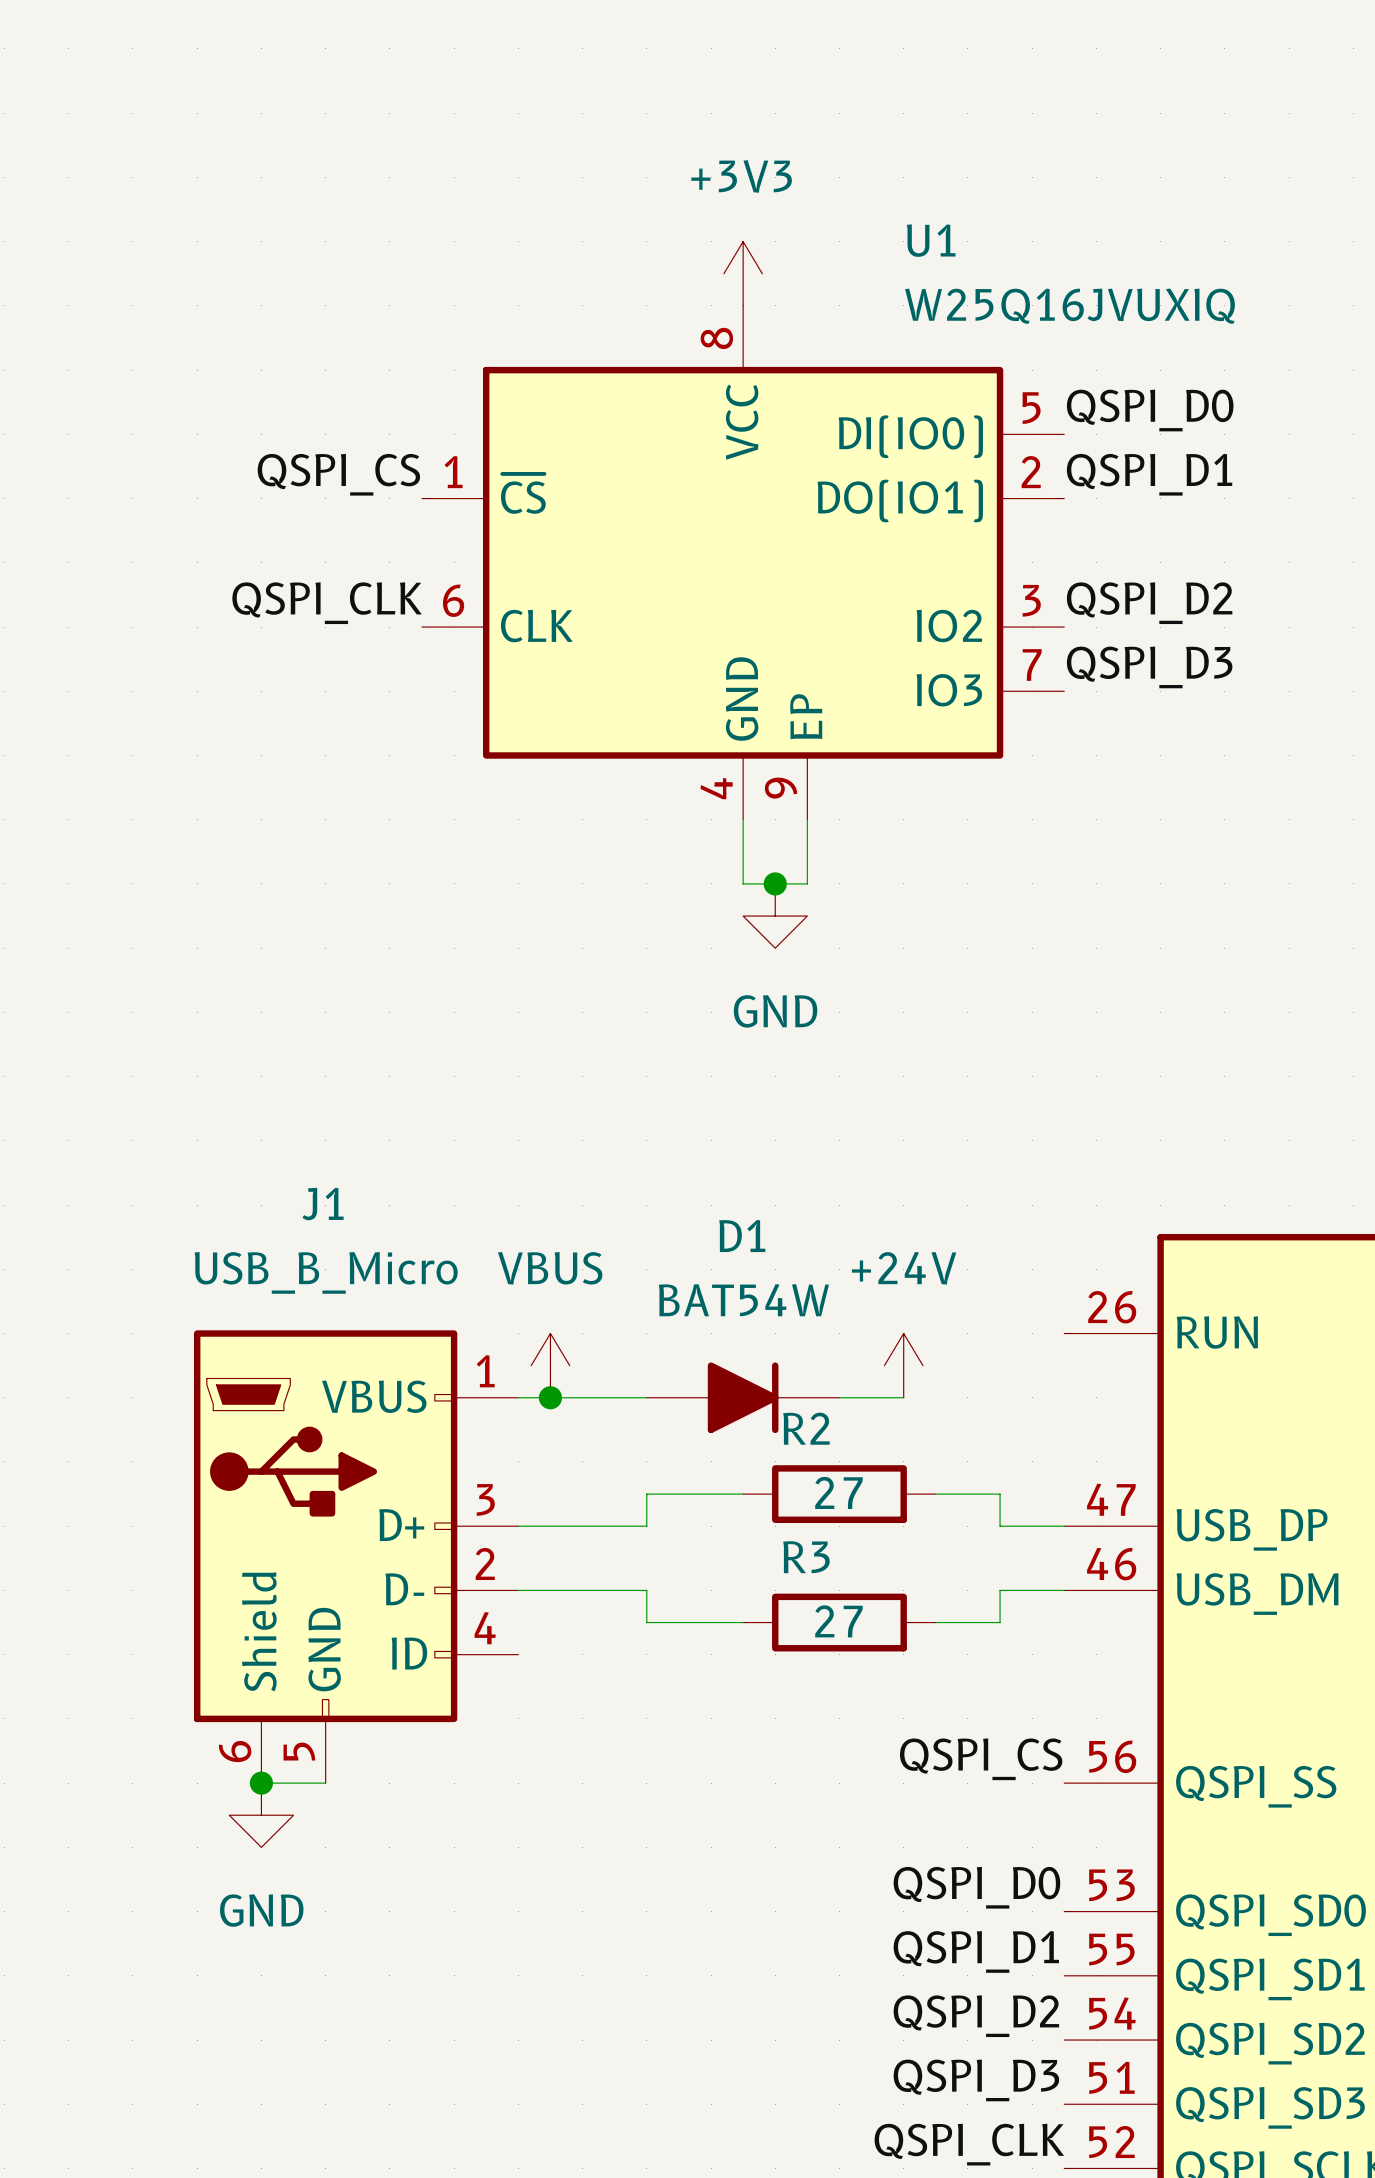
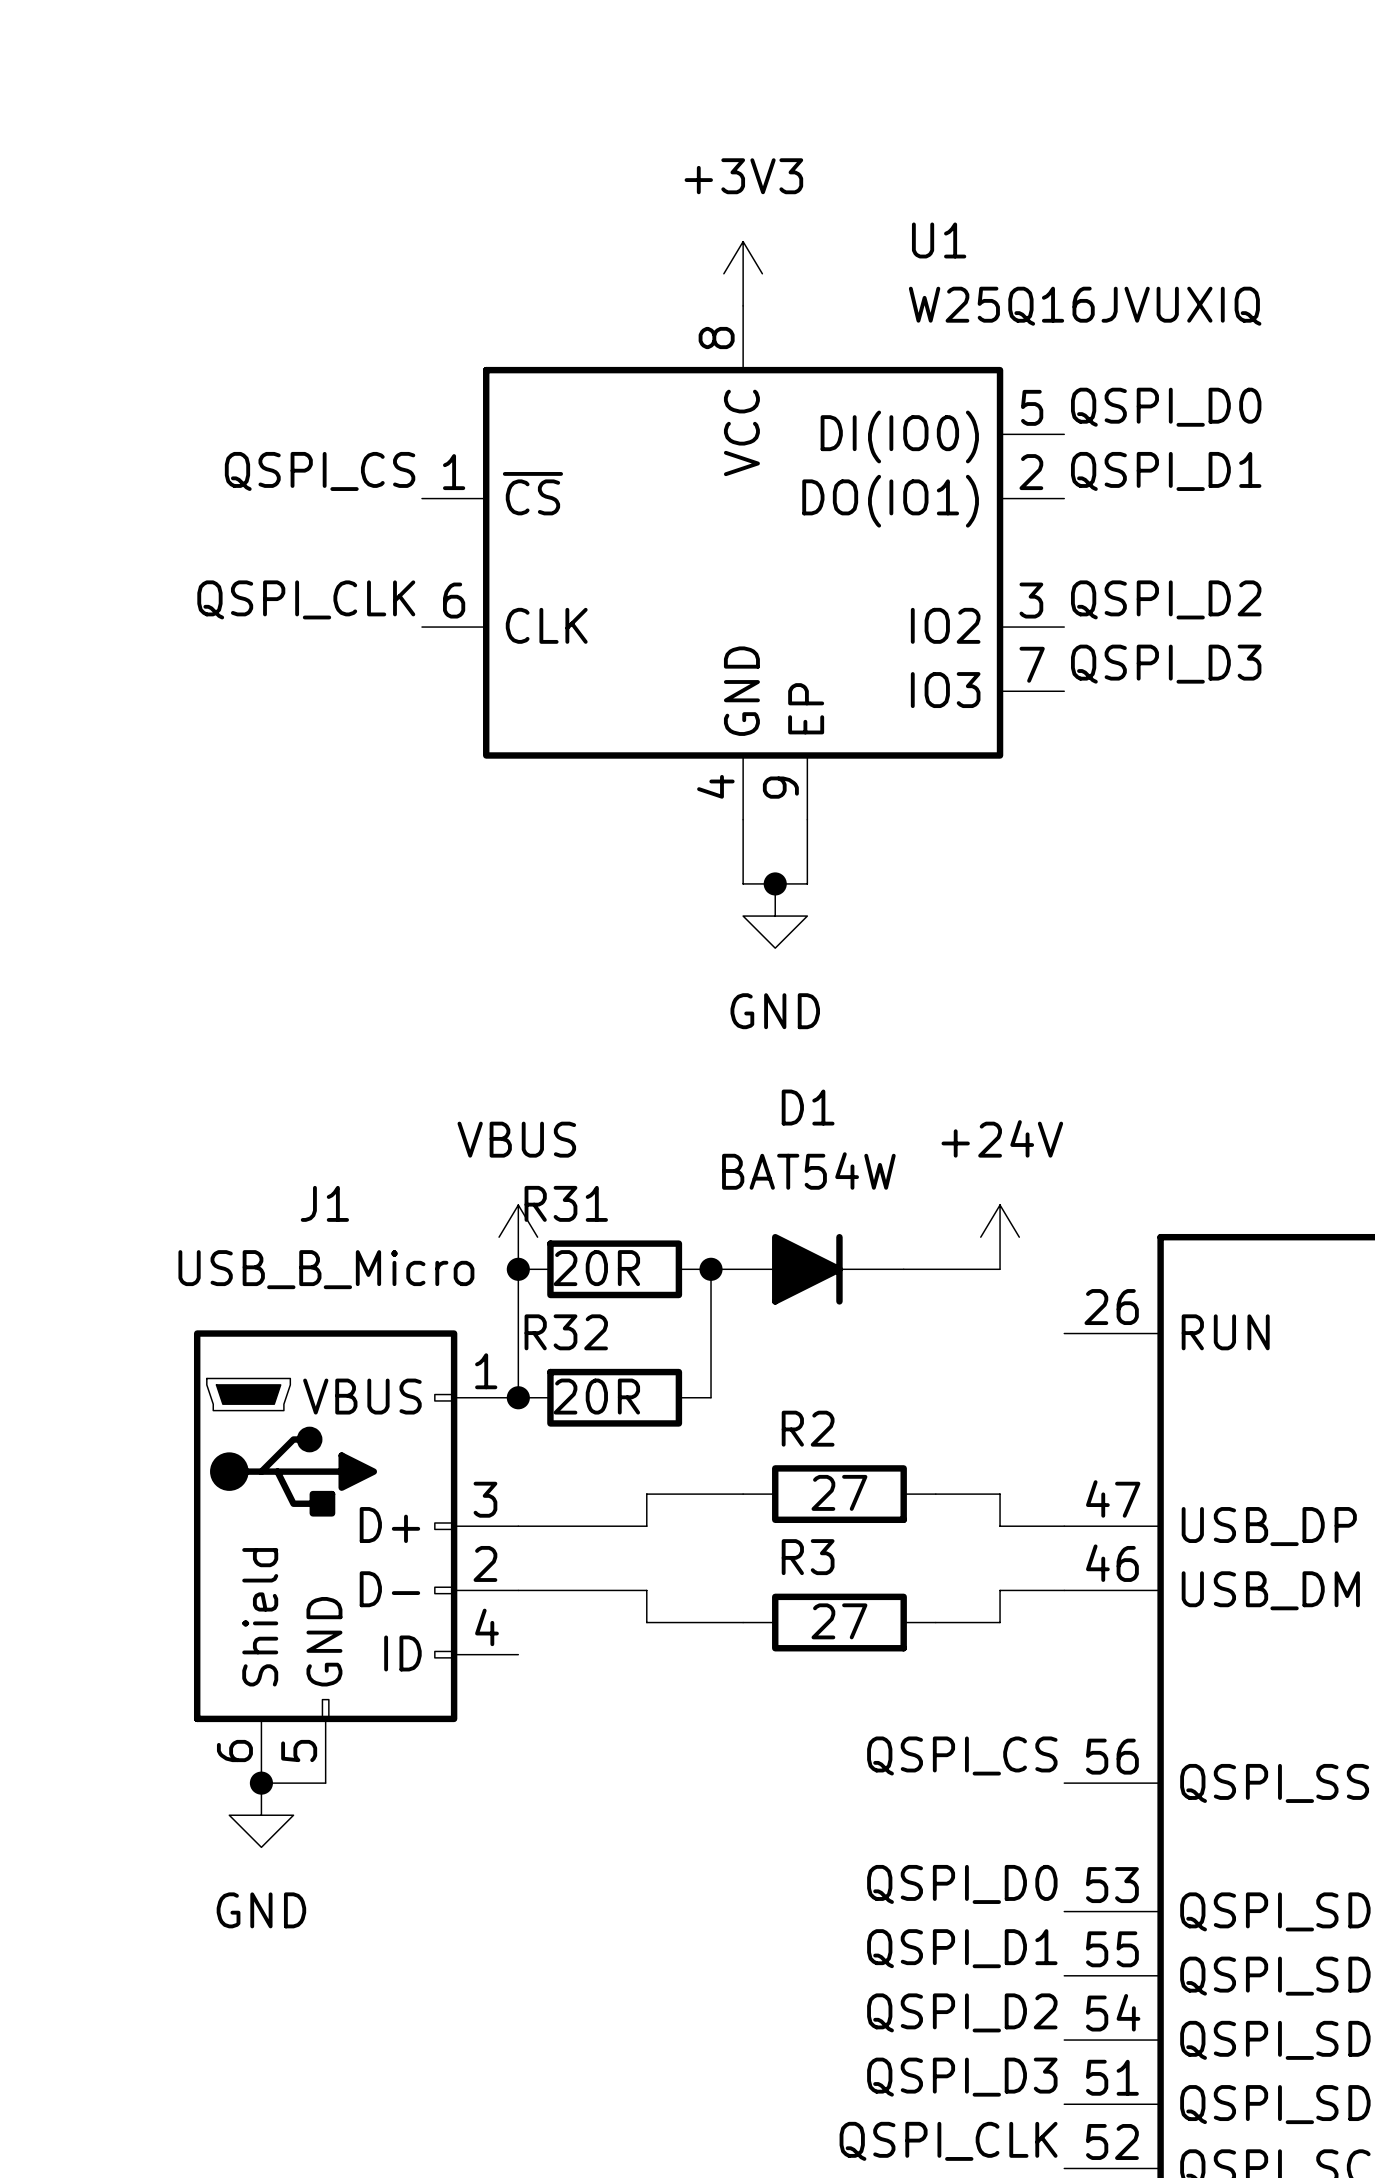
junction: none -> (518, 1269)
R31: none -> 20R (614, 1269)
wire: none -> (711, 1269) (711, 1397)
junction: none -> (711, 1269)
wire: none -> (903, 1269) (1000, 1269)
power symbol position: VBUS (550, 1365) -> VBUS (518, 1237)
power symbol position: +24V (903, 1365) -> +24V (1000, 1237)
wire: (518, 1397) (646, 1397) -> (518, 1397) (518, 1269)
junction position: (550, 1397) -> (518, 1397)
R32: none -> 20R (614, 1397)
D1 position: (743, 1397) -> (807, 1269)
wire: (839, 1397) (903, 1397) -> none

